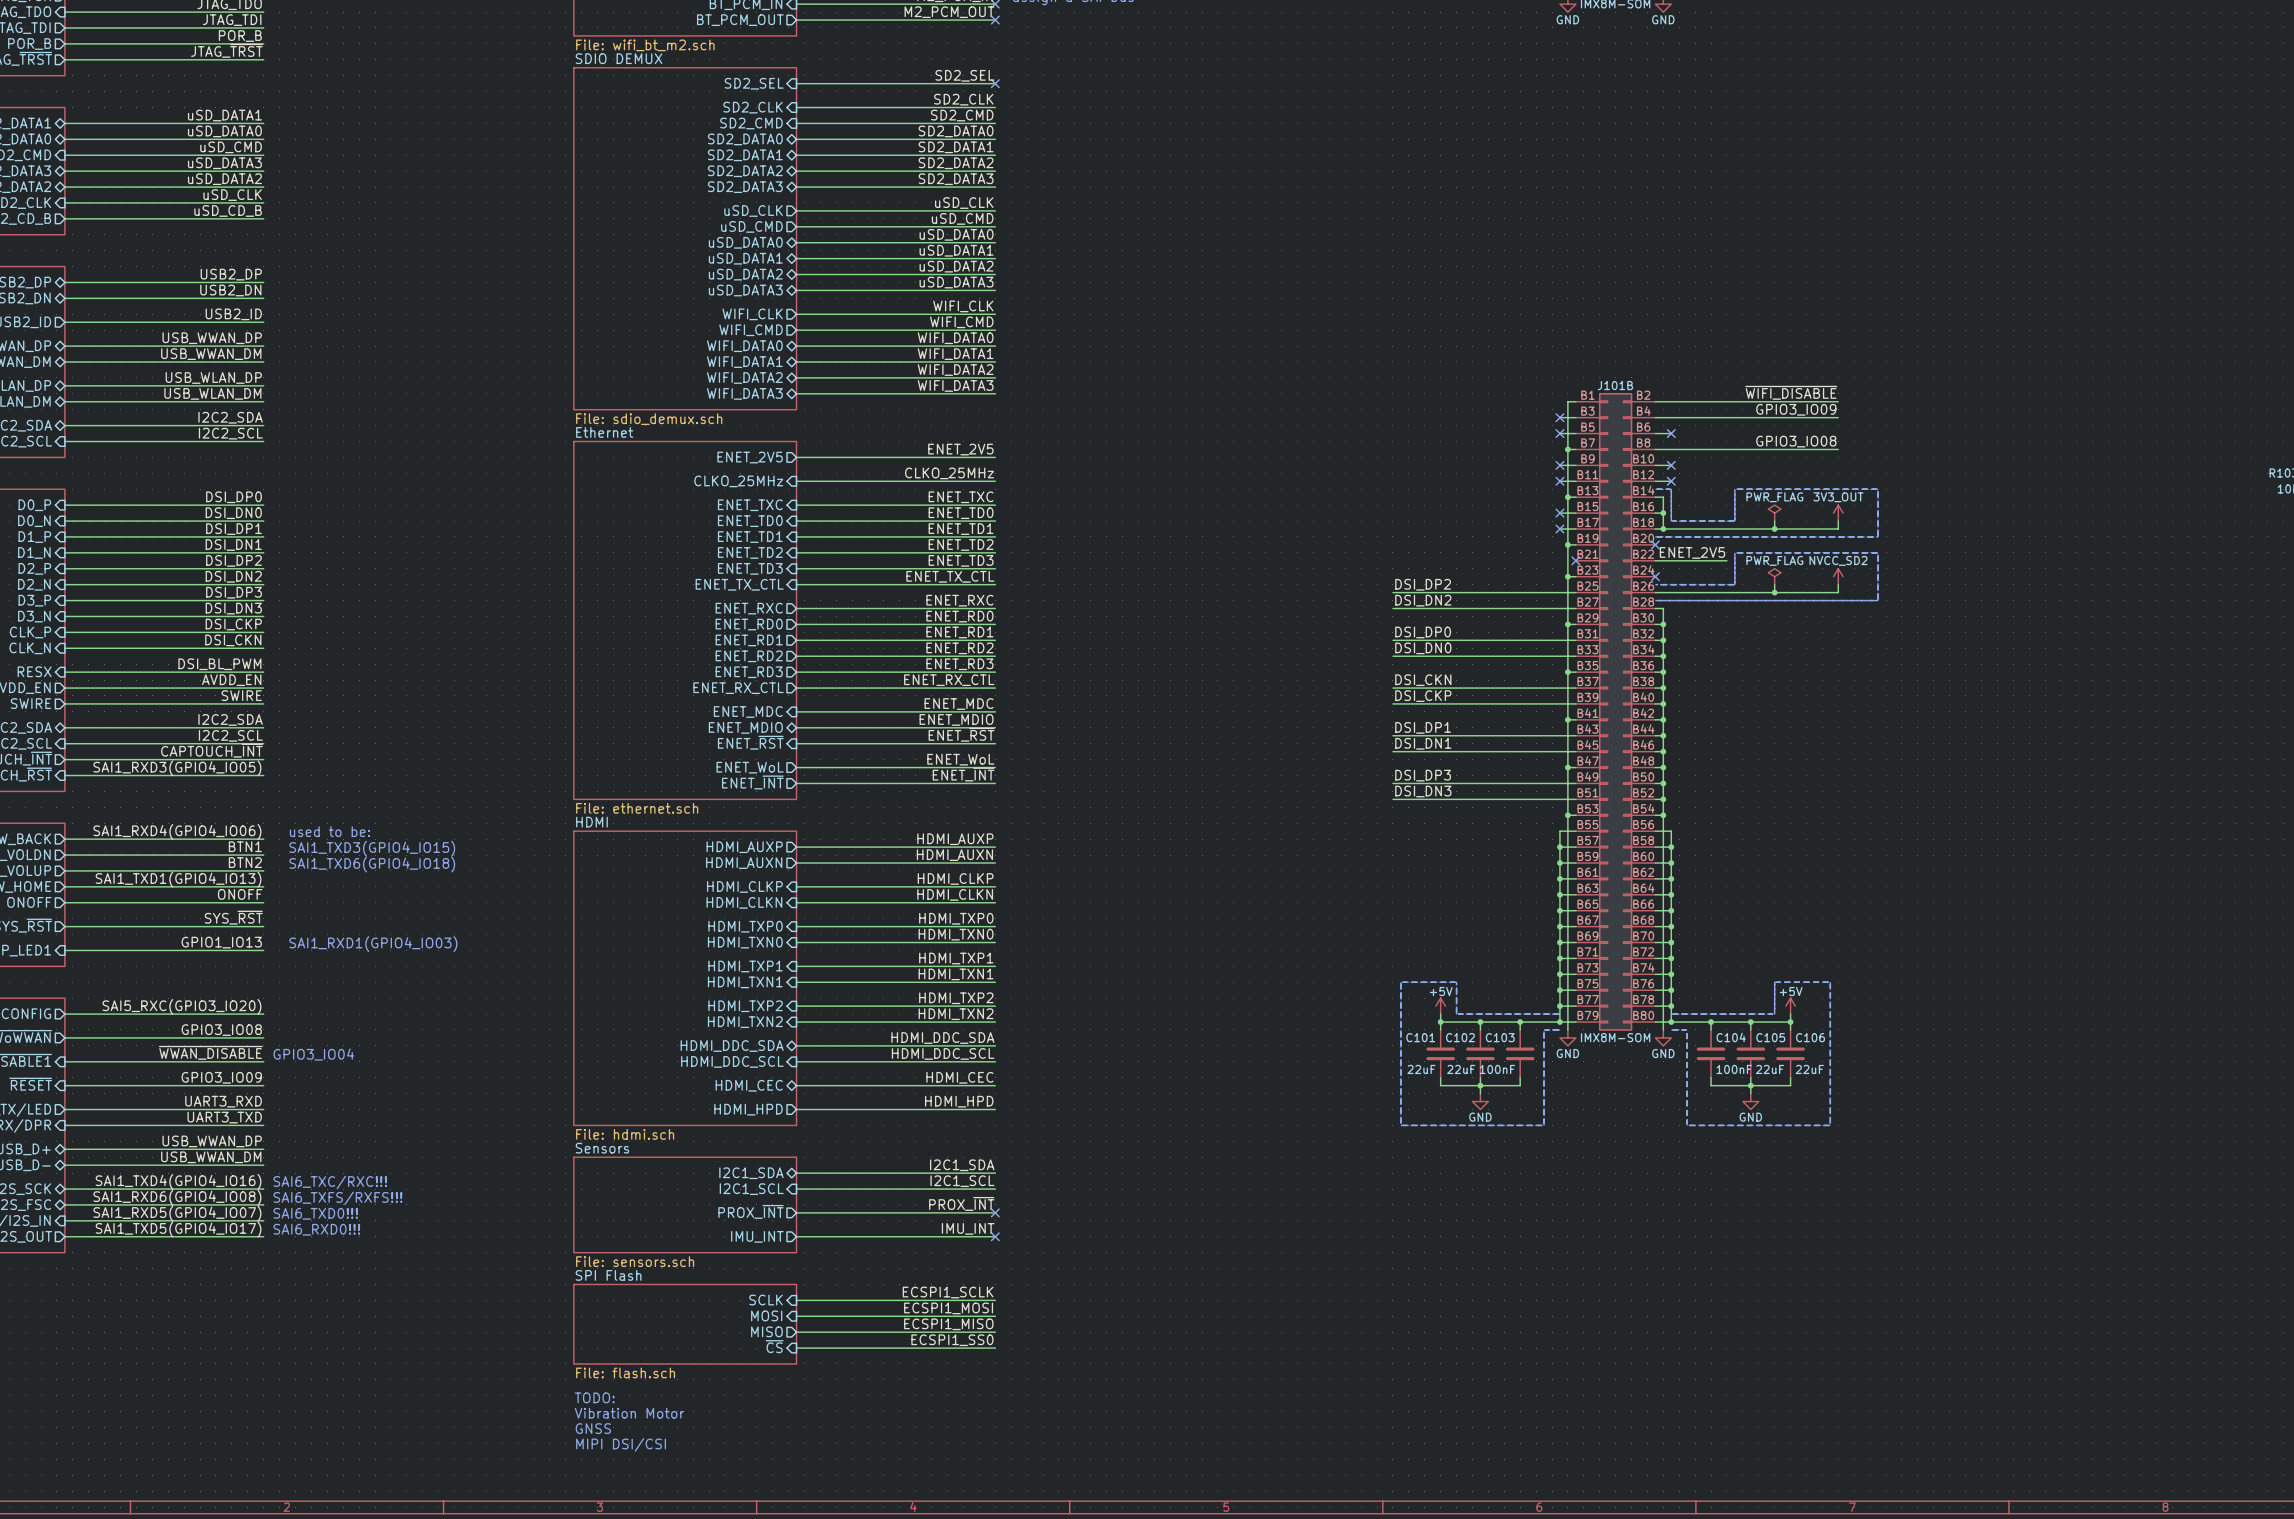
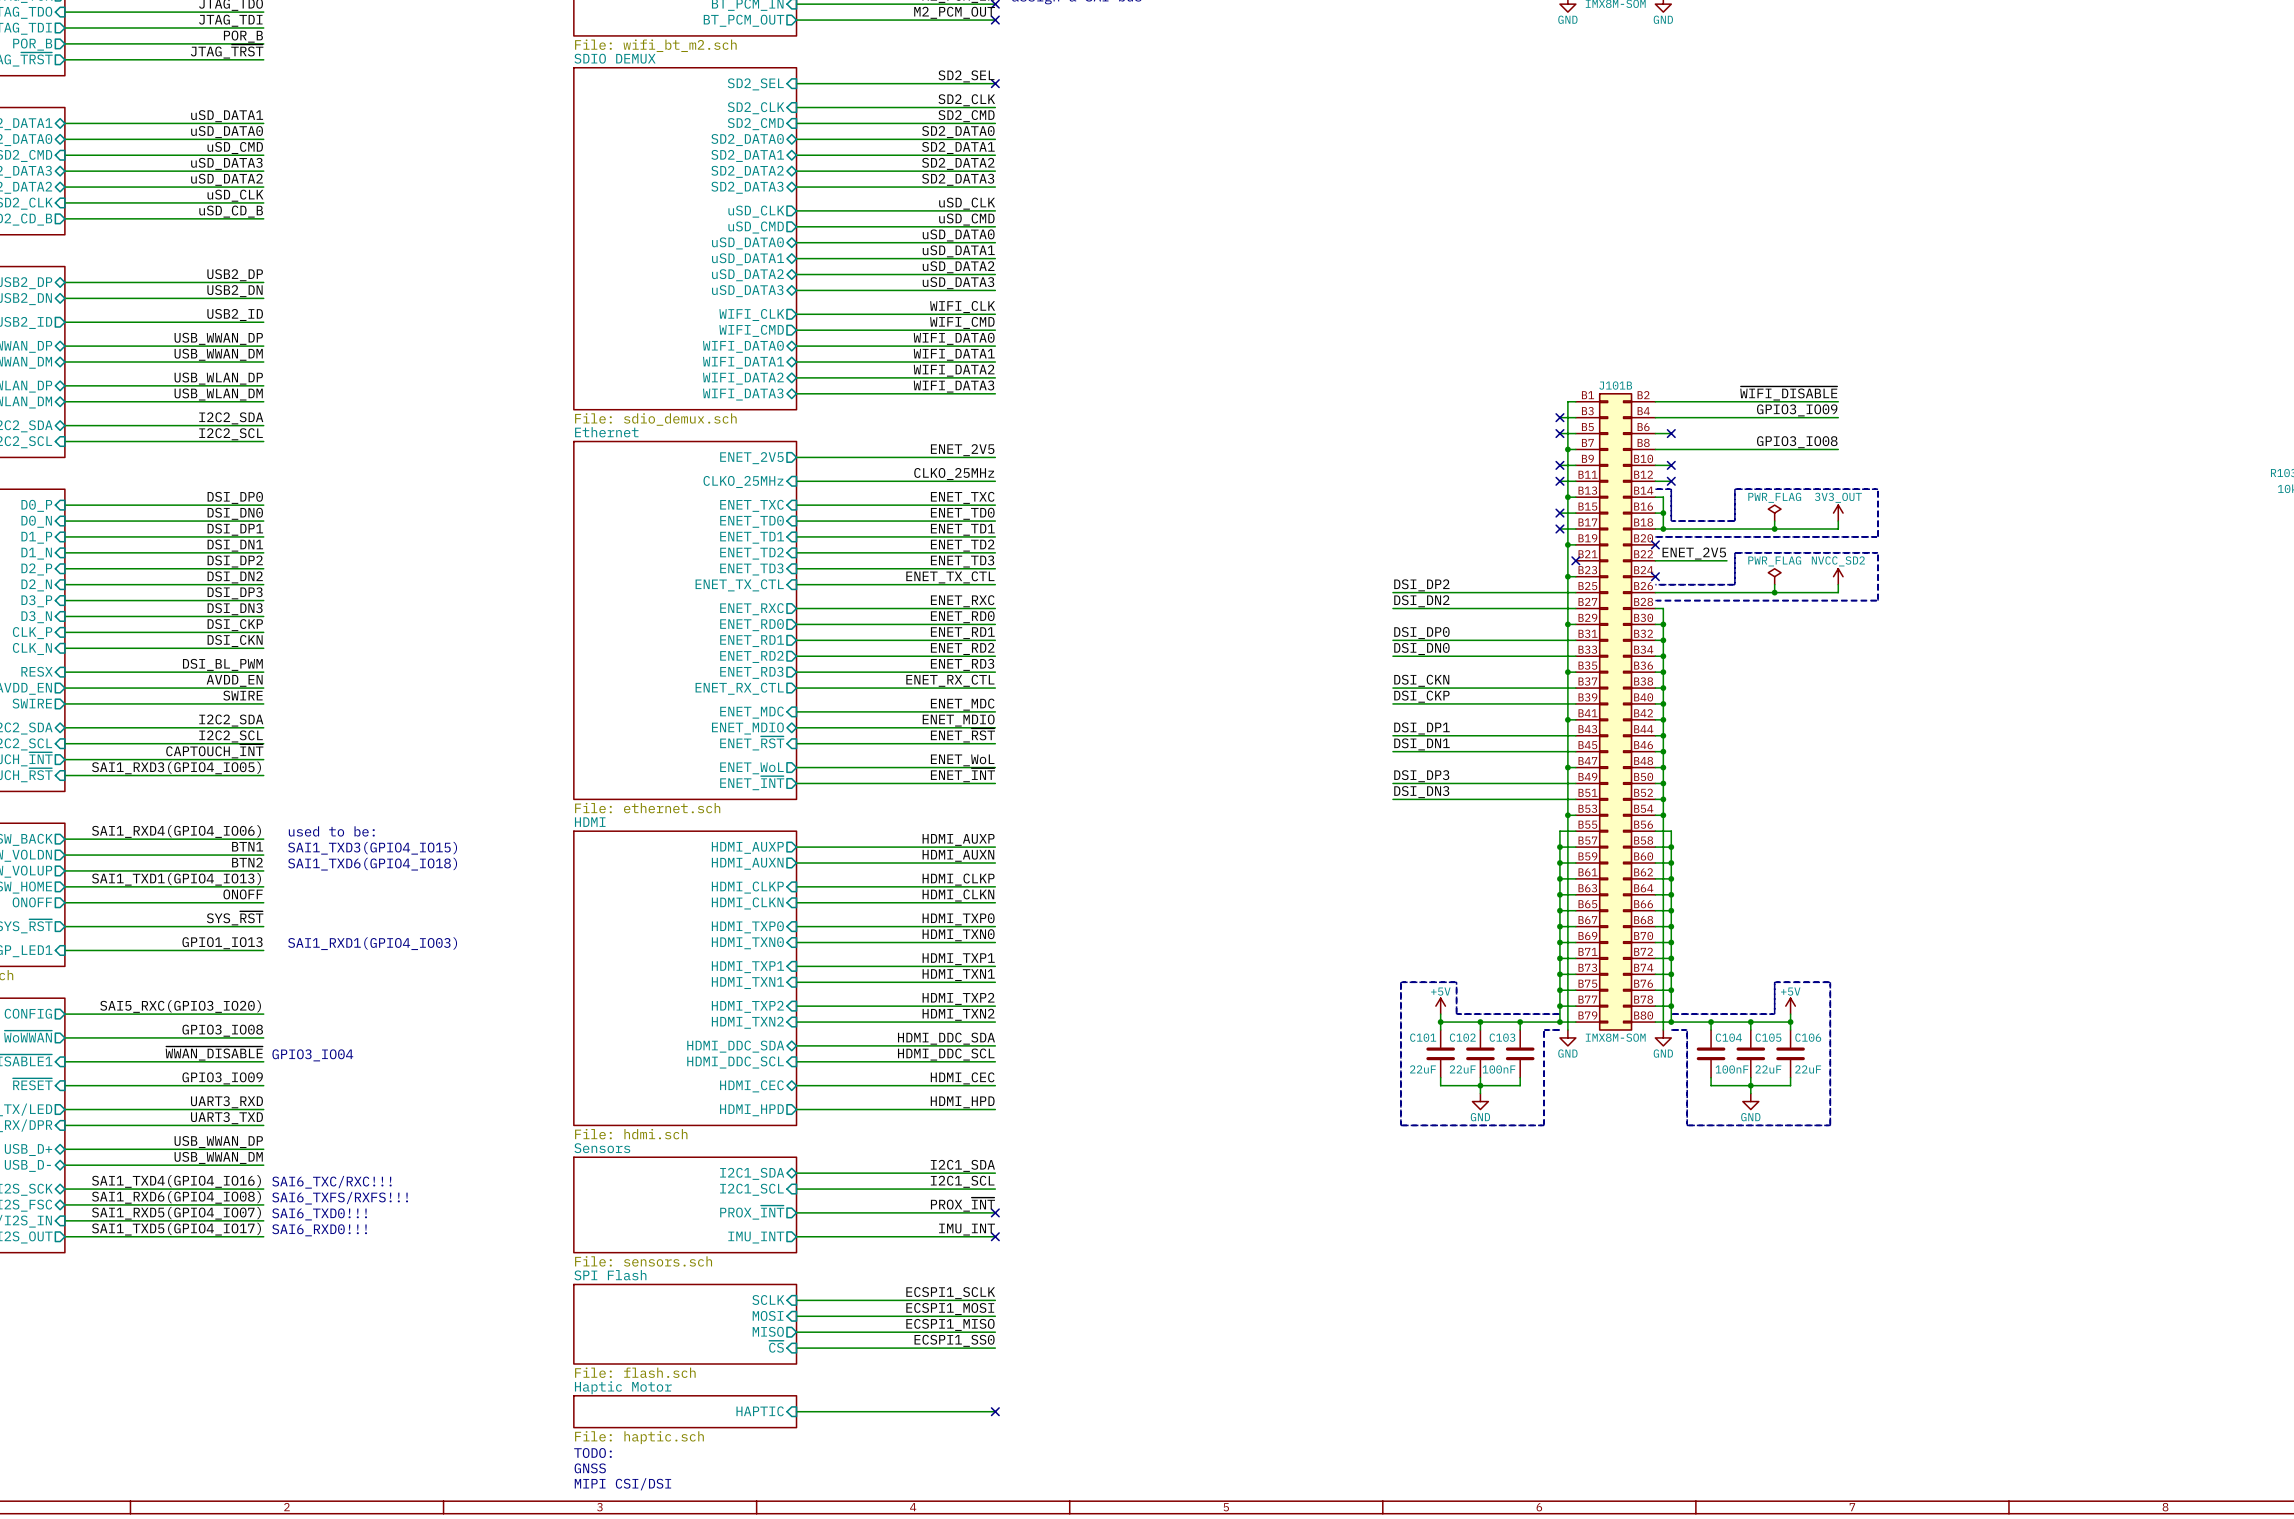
text position: TODO: (594, 1397) -> TODO: (592, 1453)
sheet Haptic Motor: none -> File: haptic.sch (685, 1411)
sheet pin: none -> HAPTIC (760, 1411)
wire: none -> (796, 1411) (995, 1411)
no-connect mark: none -> (995, 1411)
text: Vibration Motor (629, 1413) -> none
text position: GNSS (593, 1428) -> GNSS (590, 1468)
text: MIPI DSI/CSI (621, 1444) -> none
text: none -> MIPI CSI/DSI (622, 1484)

